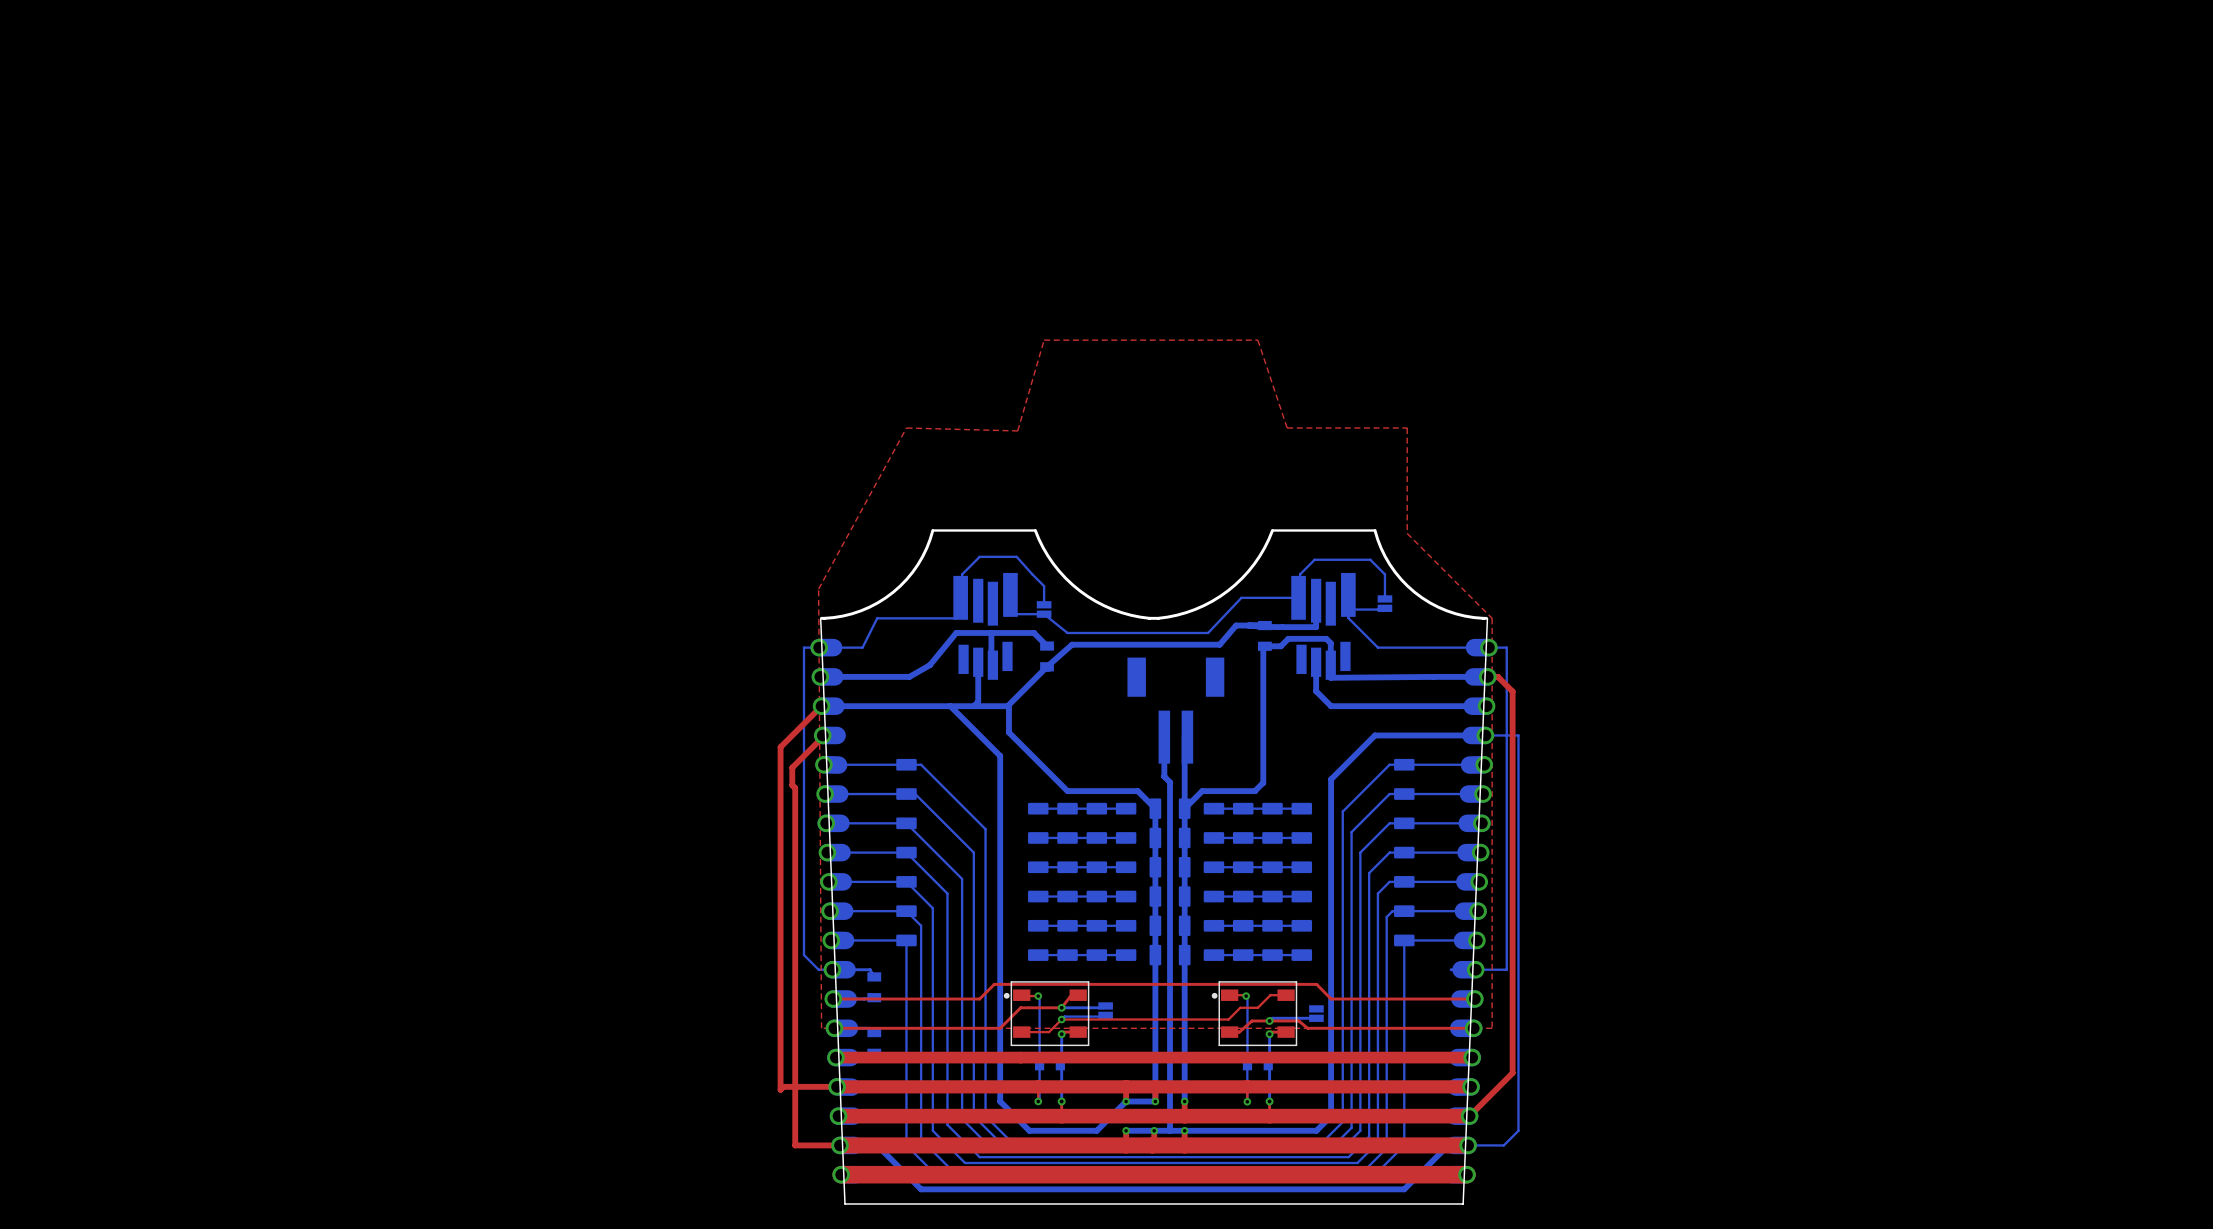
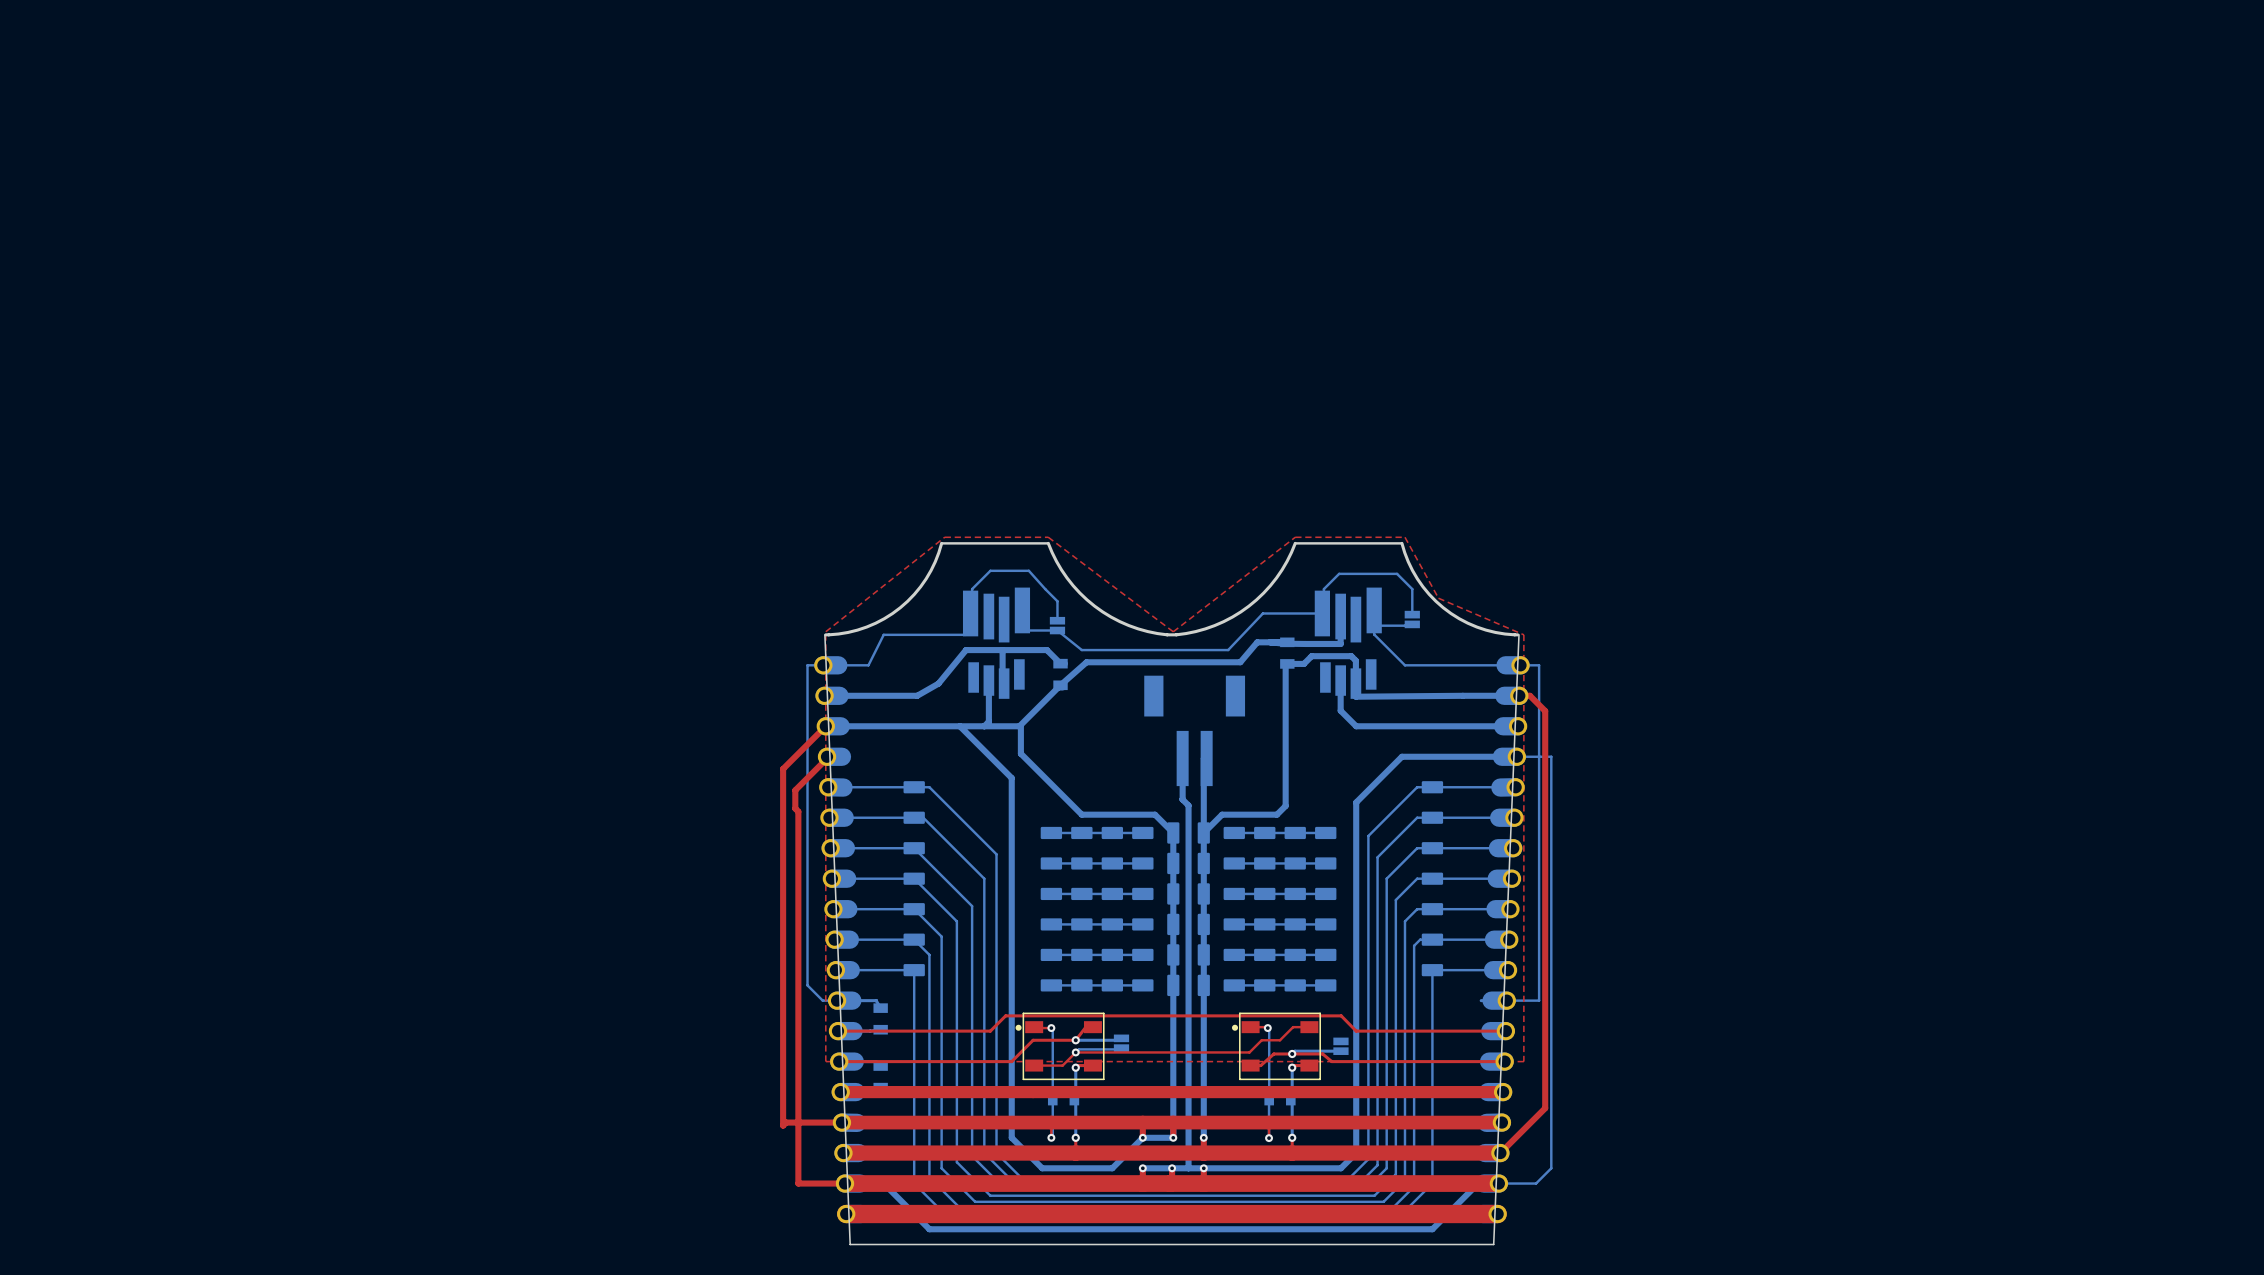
top zone outline: (1492, 618) (1407, 533) (1407, 428) (1287, 428) (1257, 340) (1044, 340) (1017, 430) (906, 428) (818, 589) (821, 1028) -> (1523, 634) (1438, 598) (1404, 537) (1295, 537) (1173, 631) (1048, 537) (944, 537) (825, 631) (825, 1061)

